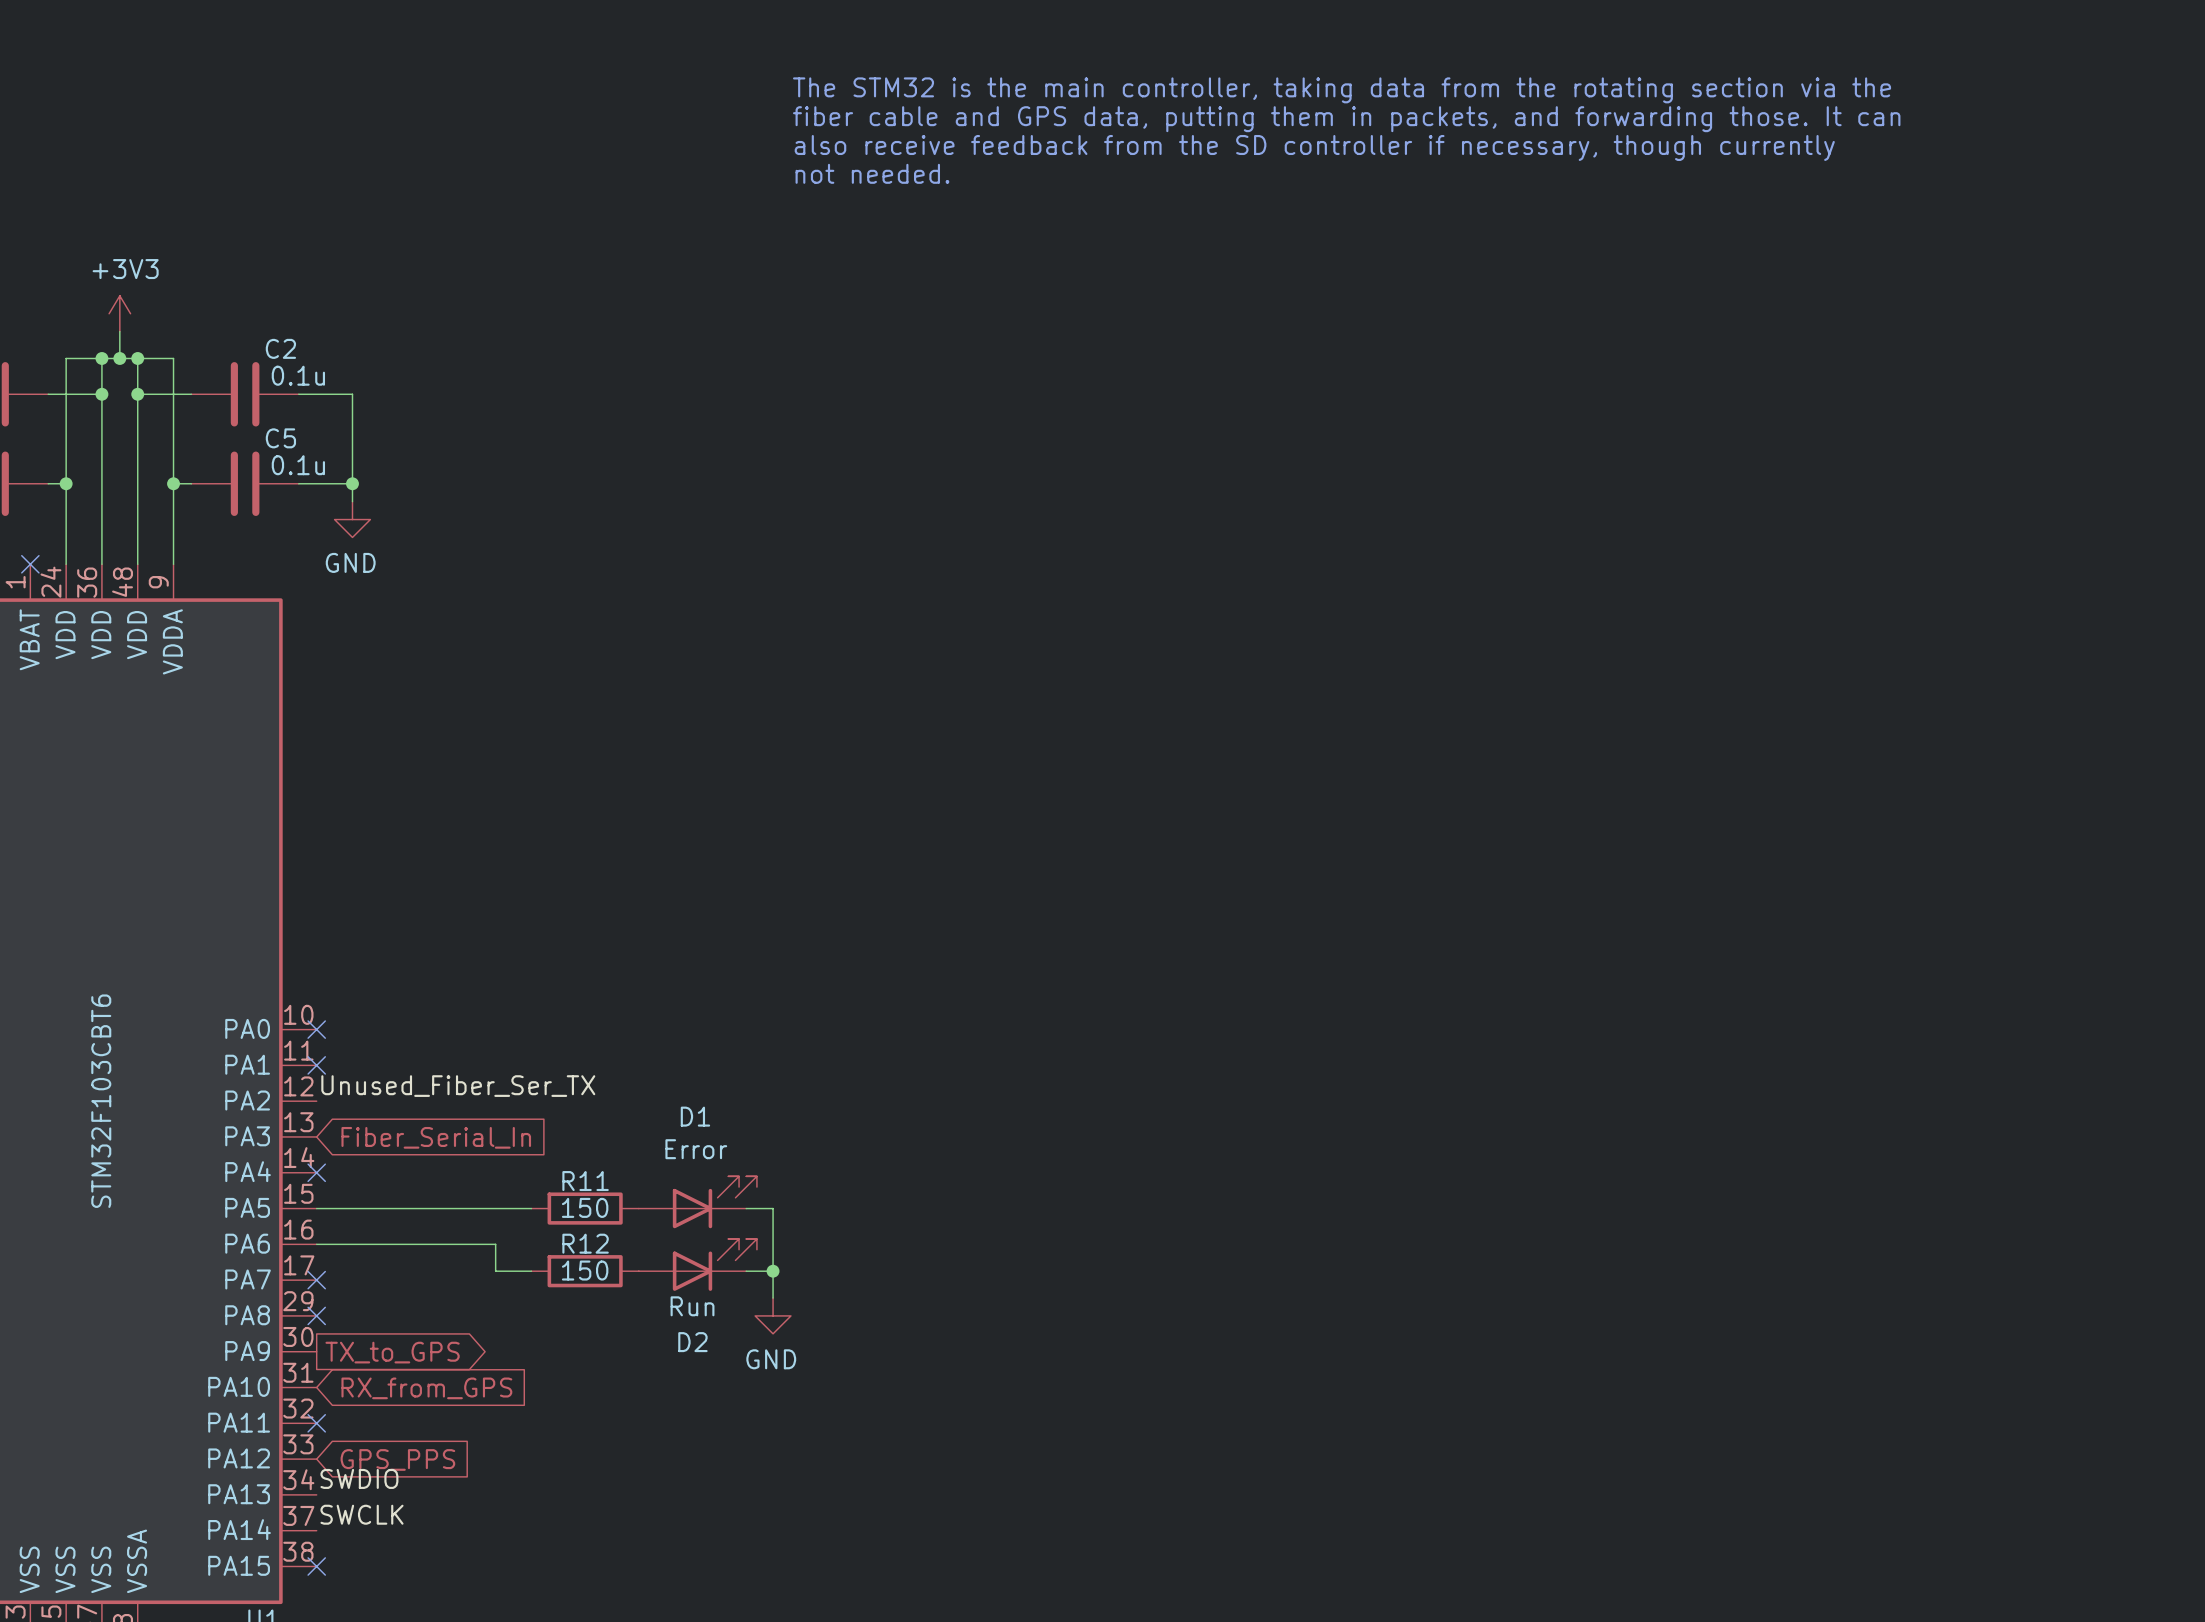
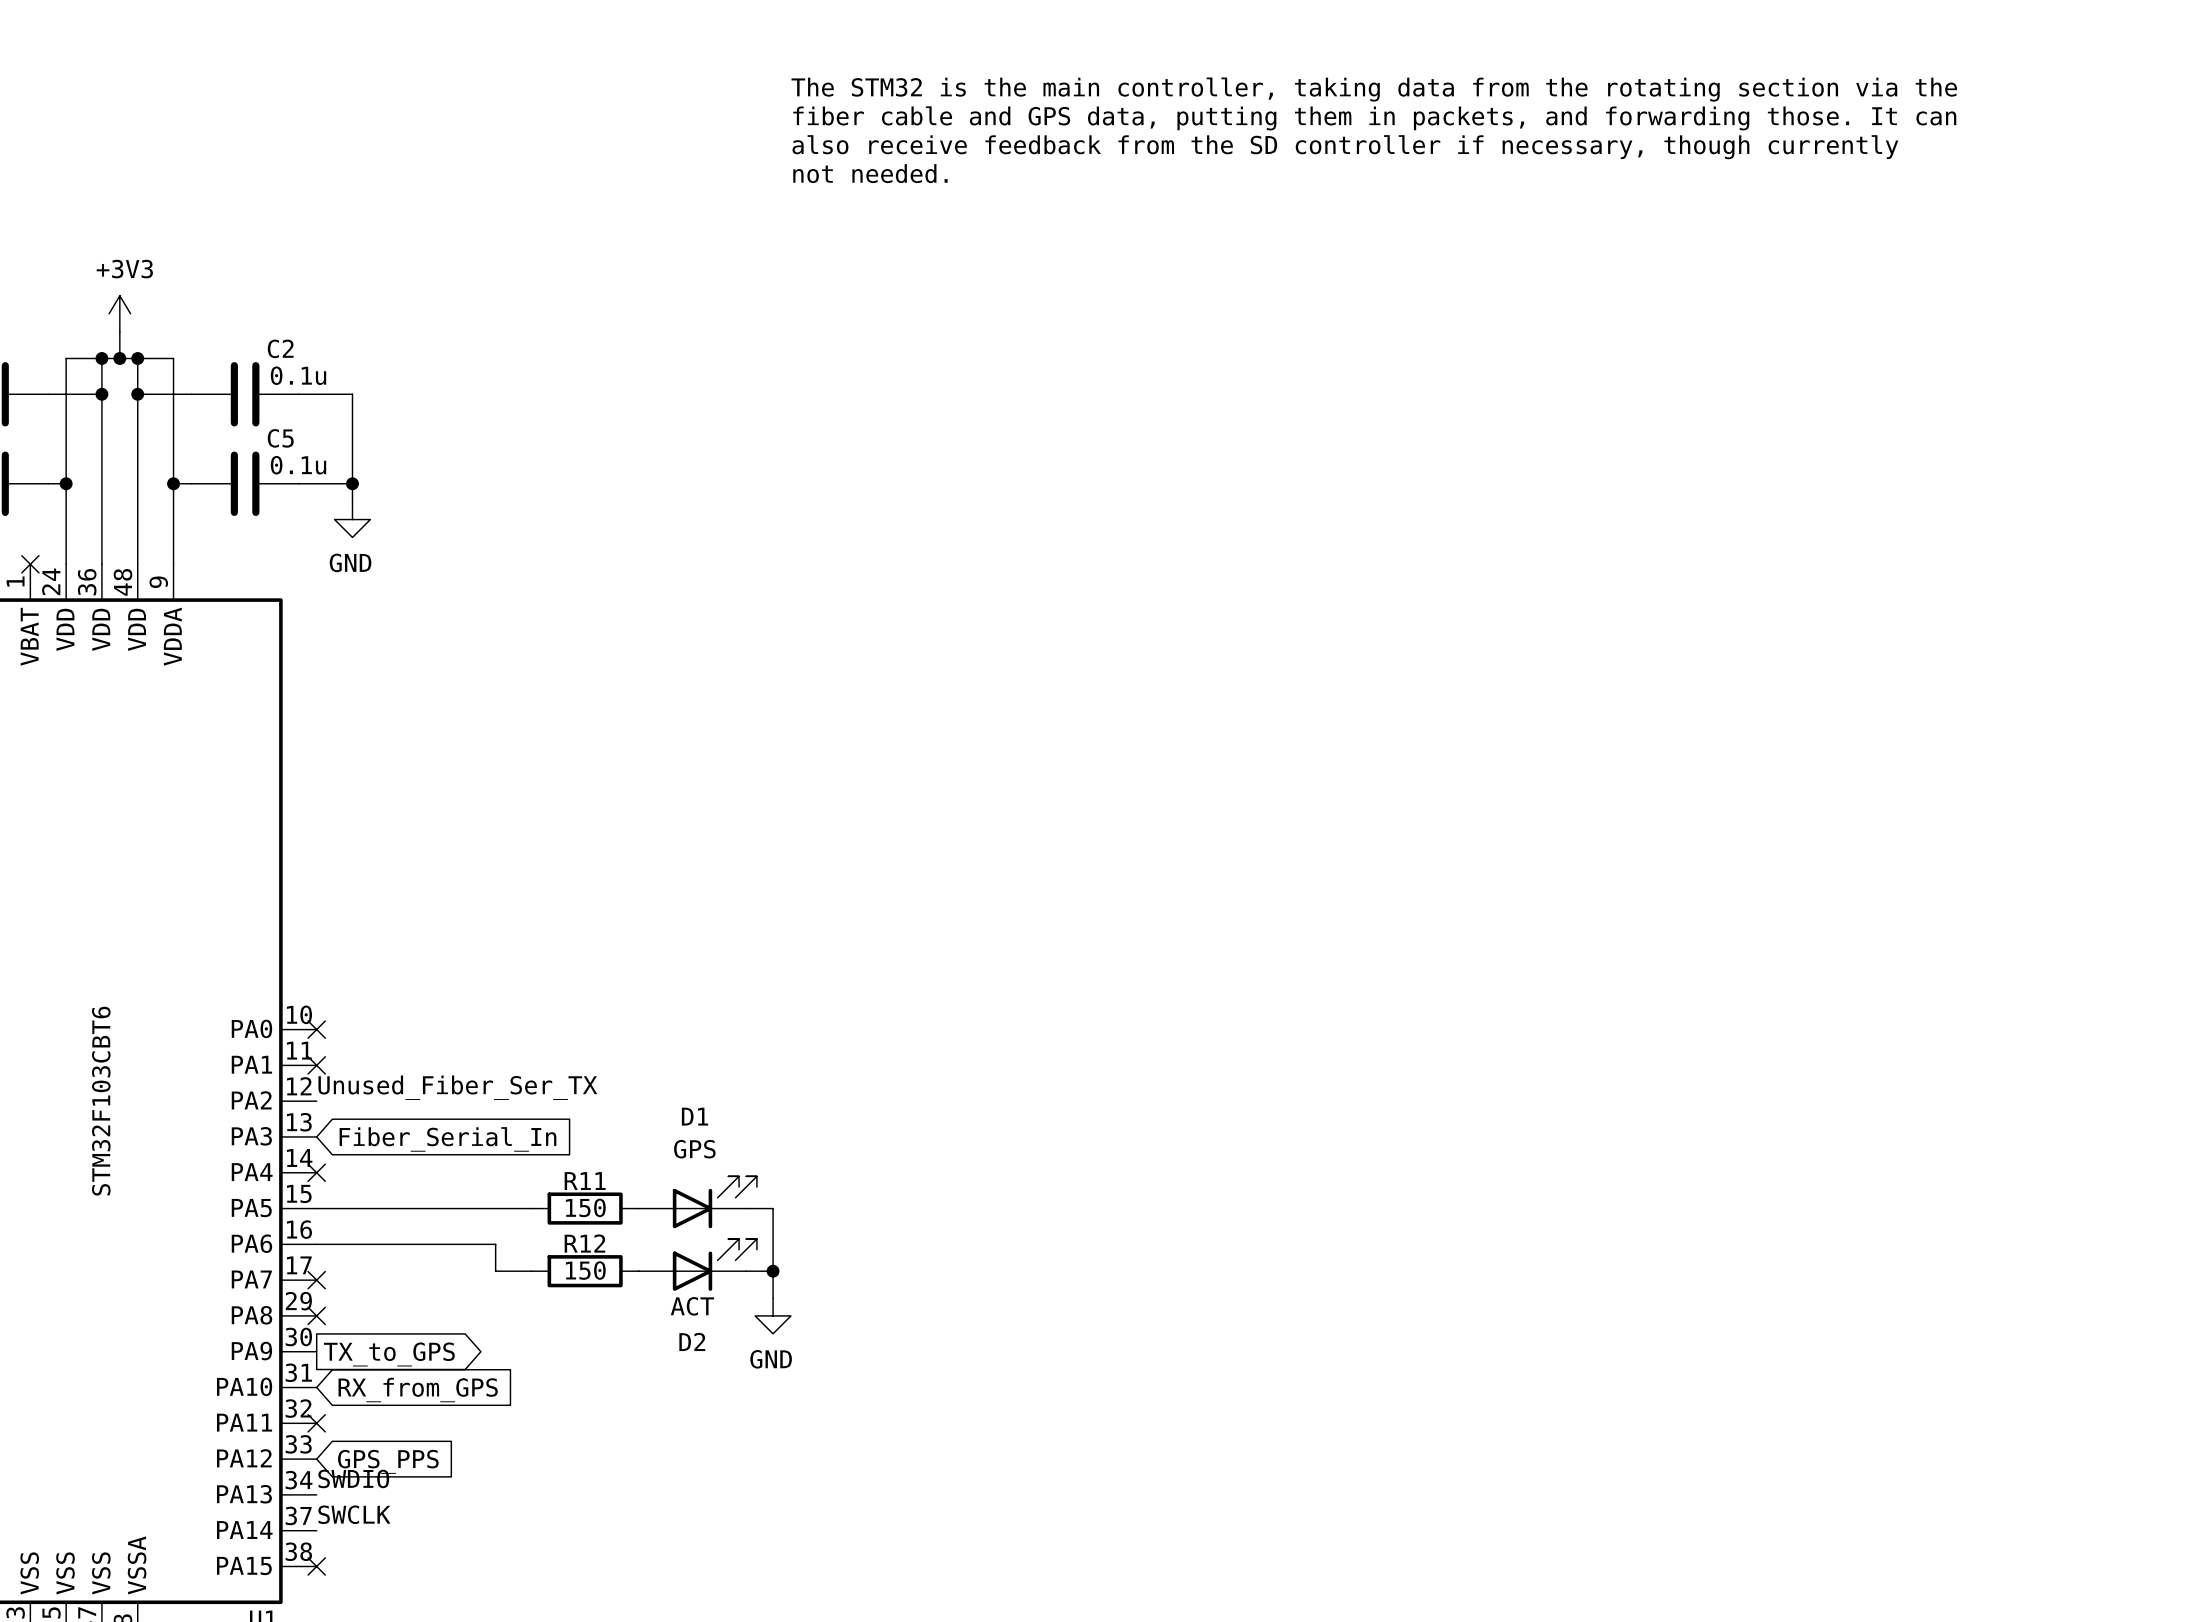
D1 value: Error (696, 1149) -> GPS (694, 1149)
D2 value: Run (692, 1306) -> ACT (692, 1306)

